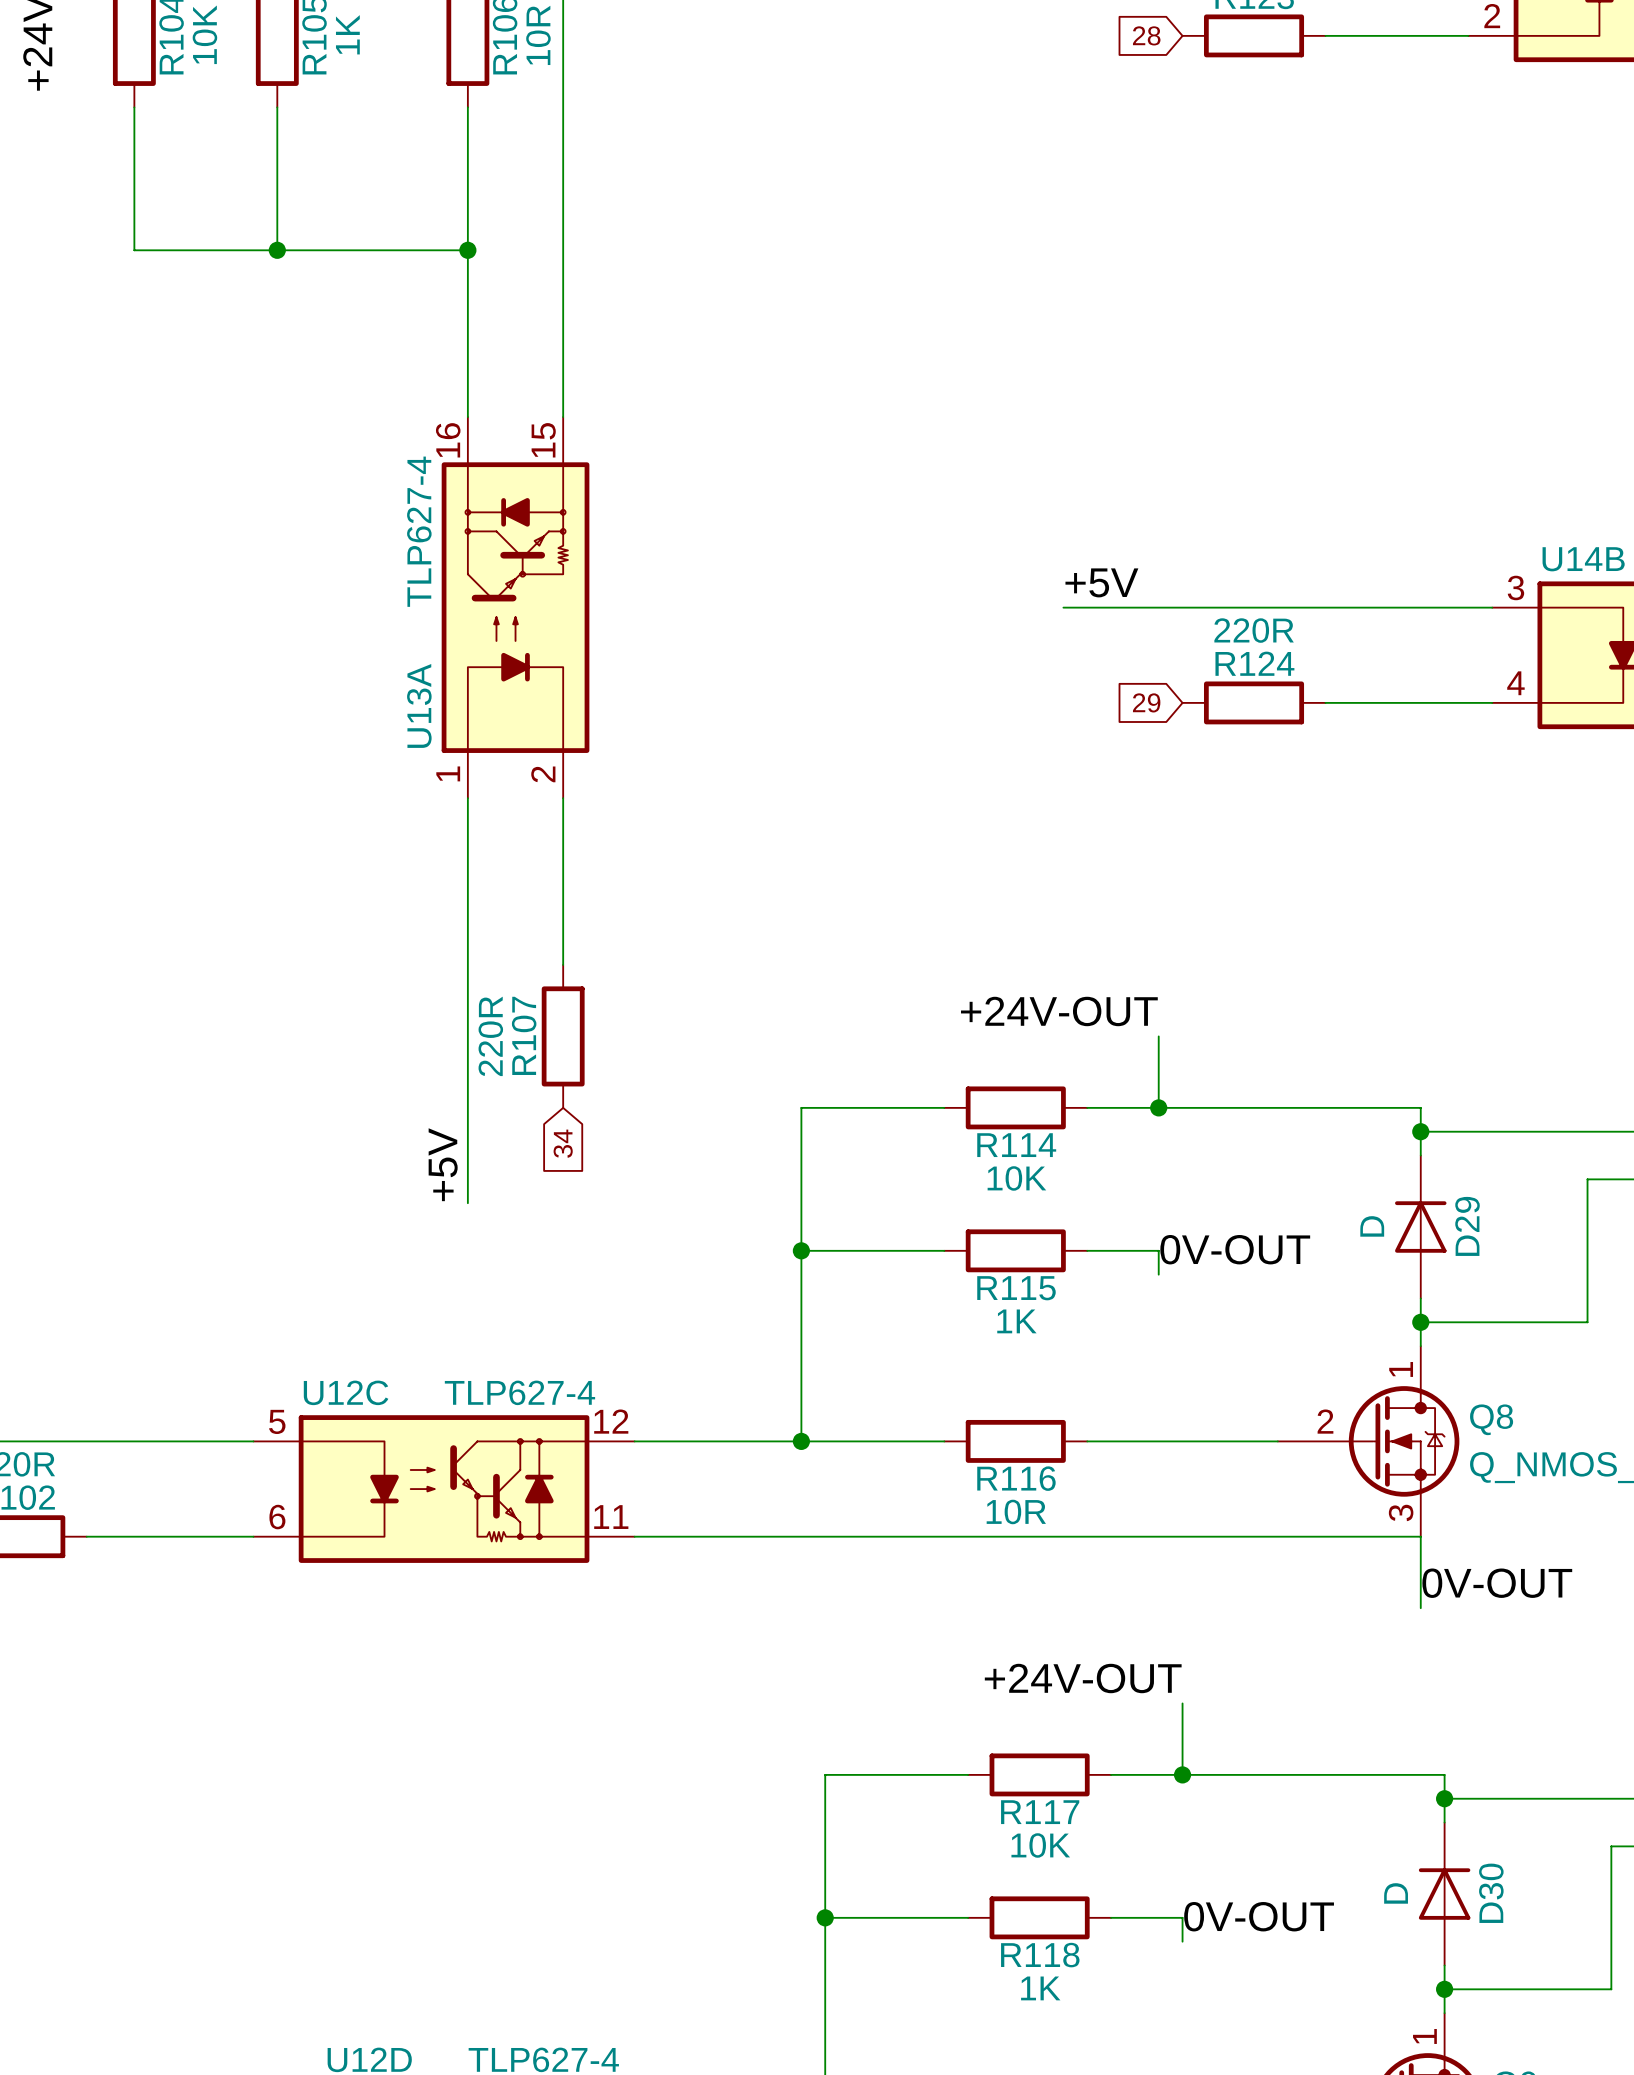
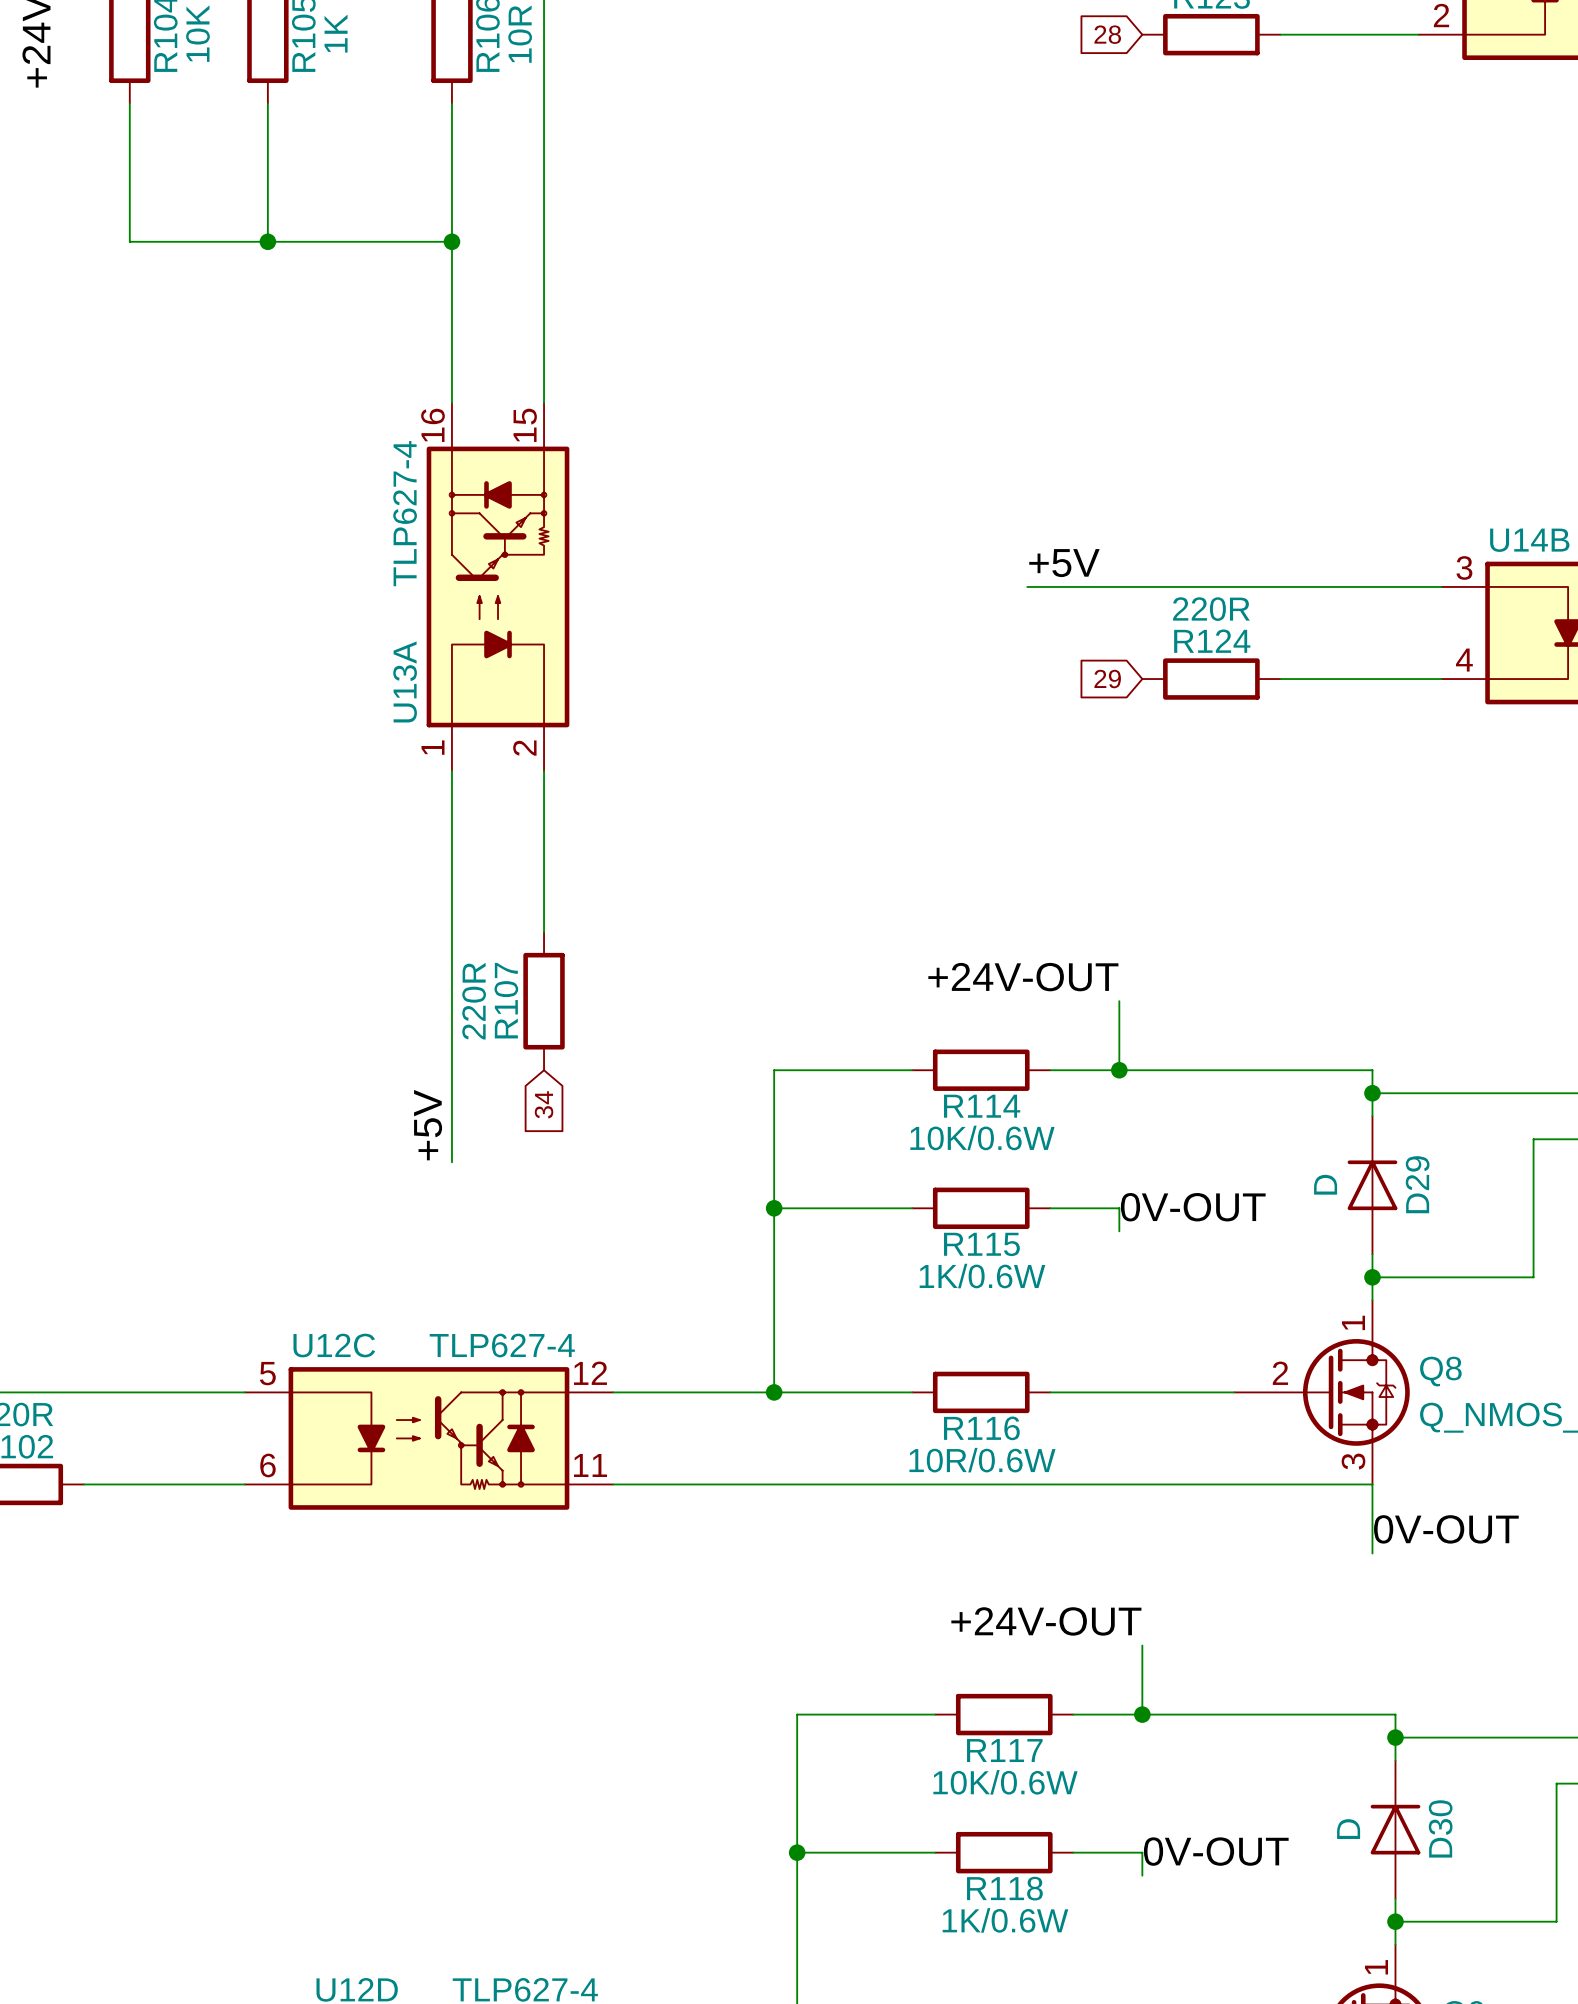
R114 value: 10K (1016, 1178) -> 10K/0.6W (982, 1137)
R115 value: 1K (1016, 1321) -> 1K/0.6W (982, 1276)
R116 value: 10R (1016, 1511) -> 10R/0.6W (982, 1460)
R117 value: 10K (1040, 1845) -> 10K/0.6W (1005, 1782)
R118 value: 1K (1040, 1988) -> 1K/0.6W (1005, 1920)

